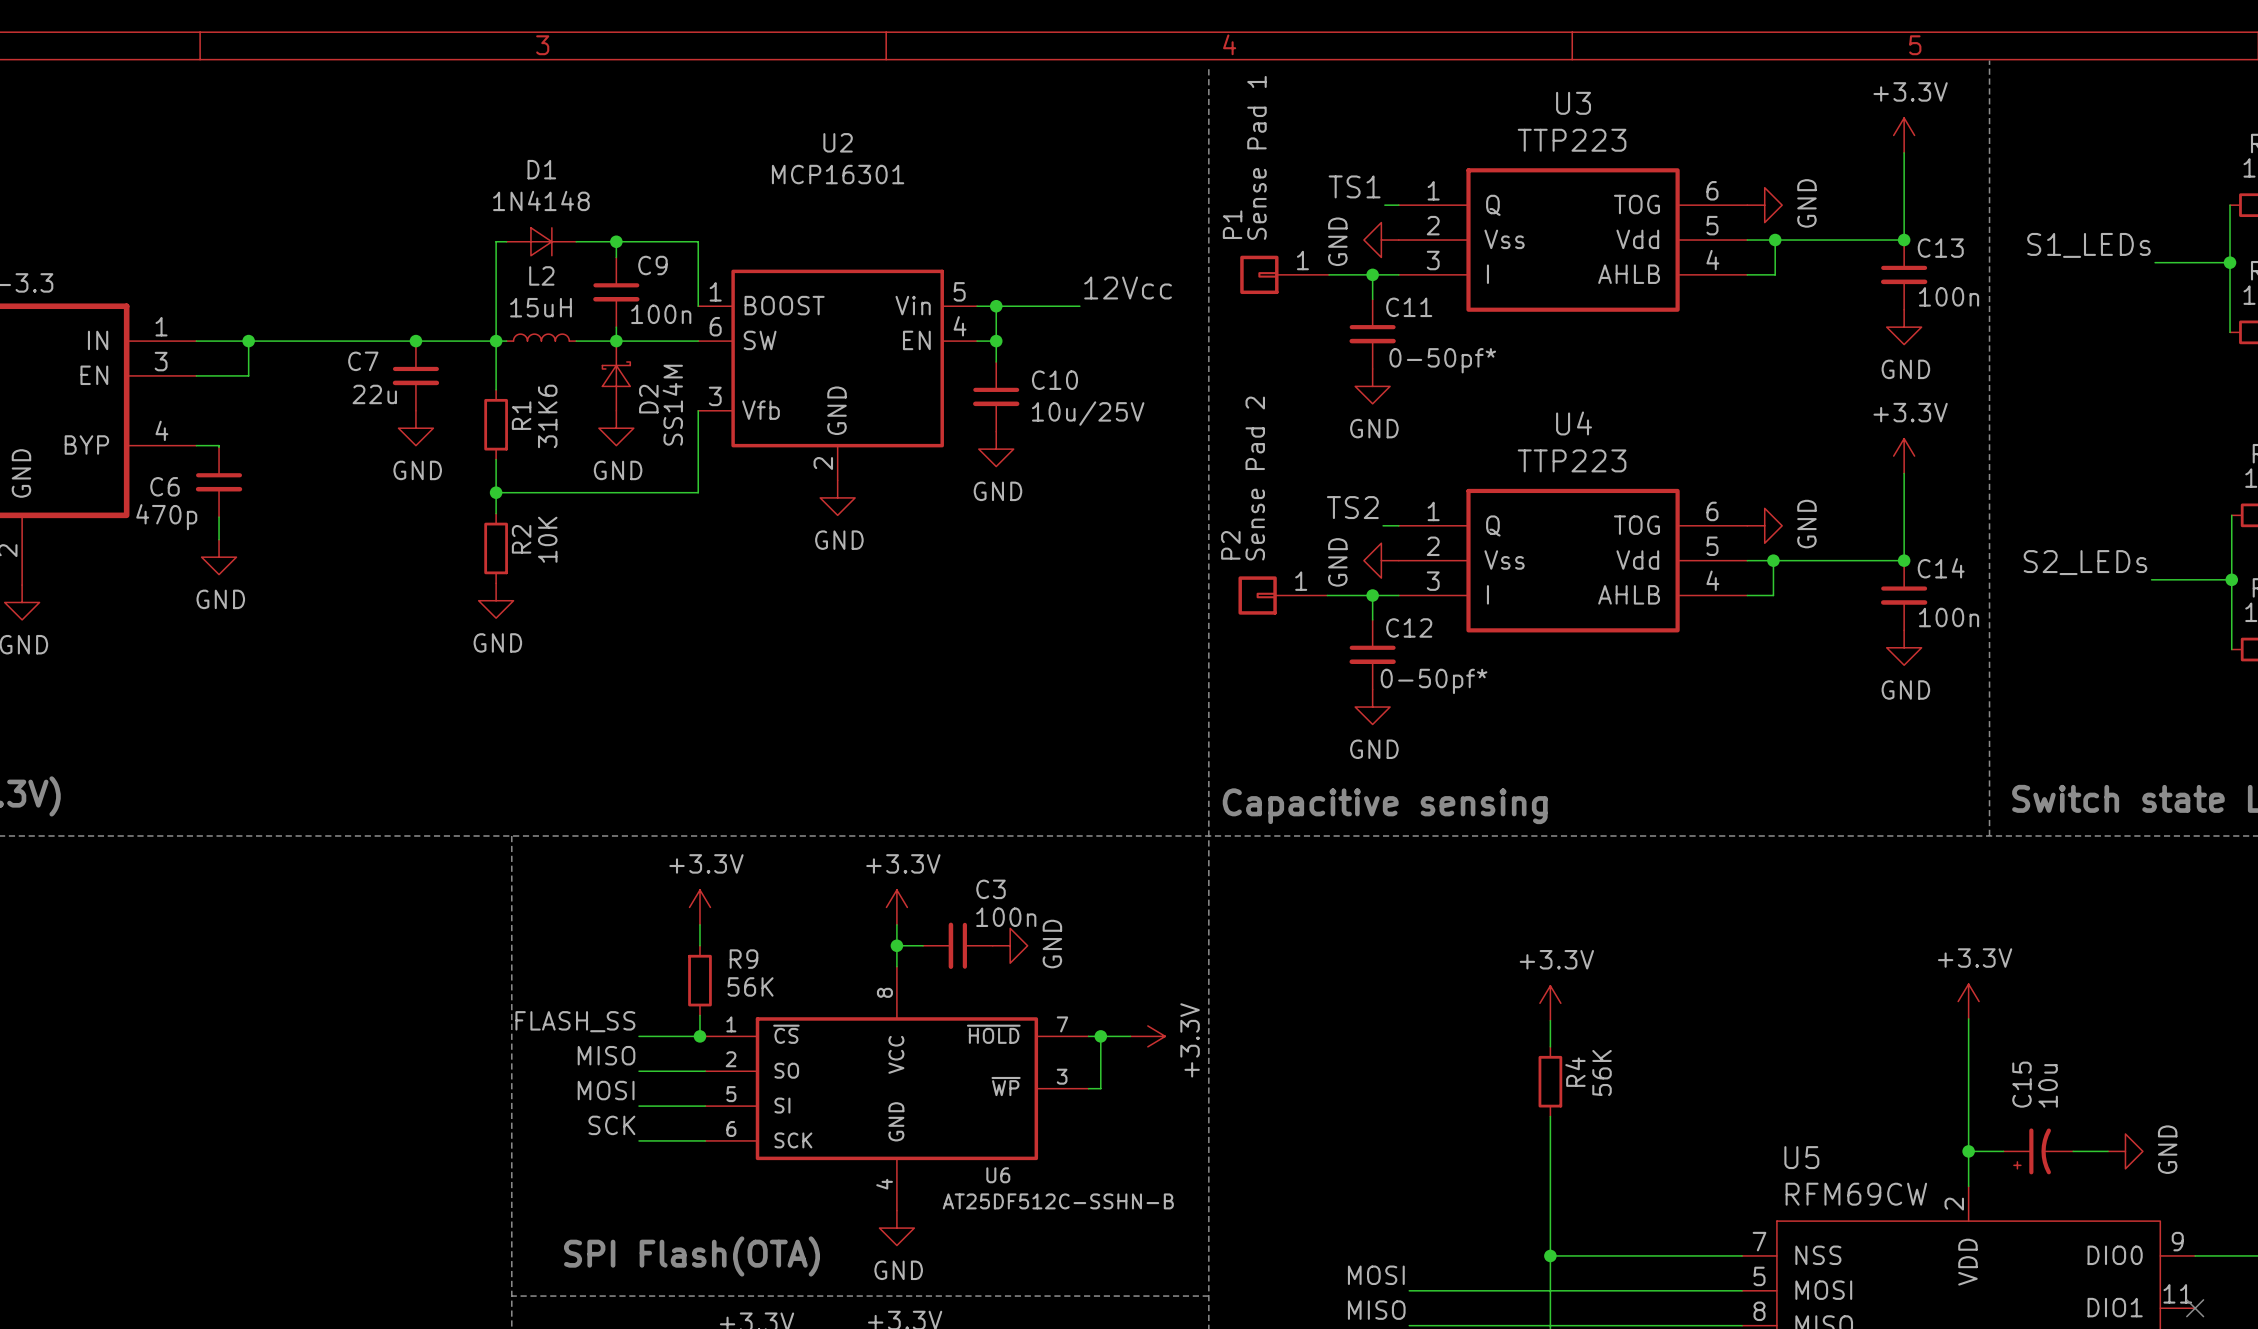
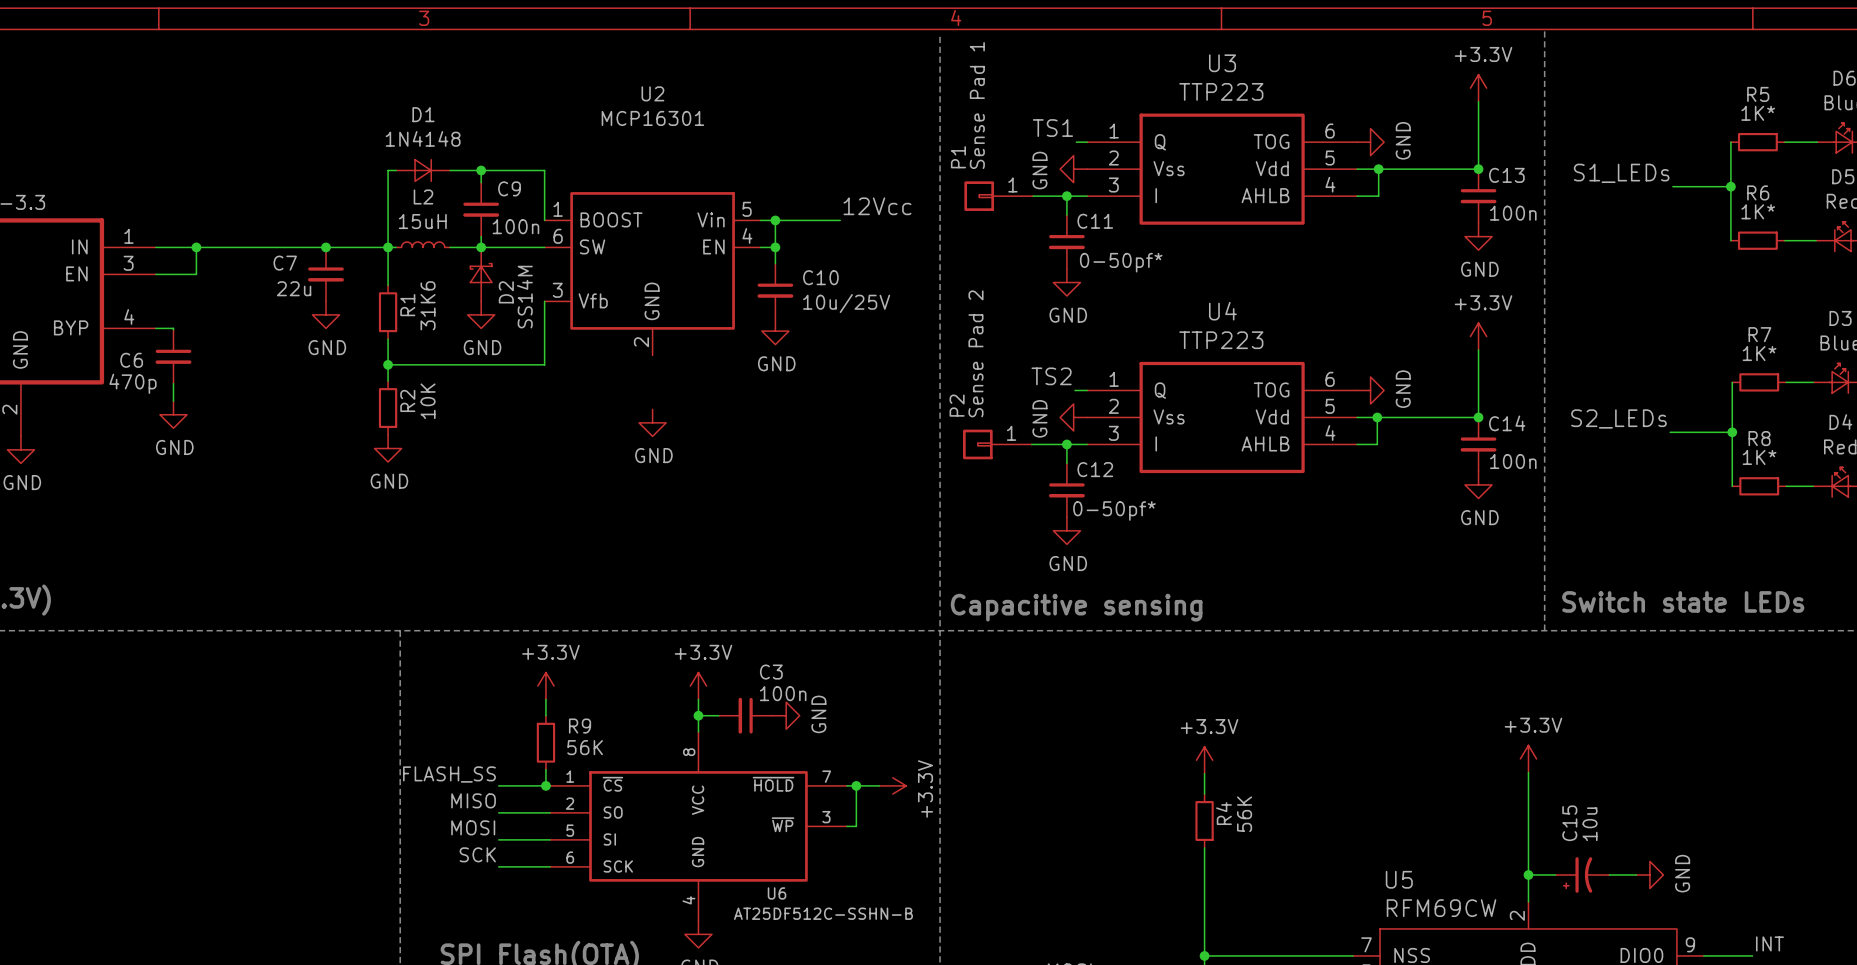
power symbol position: GND (837, 497) -> GND (652, 422)

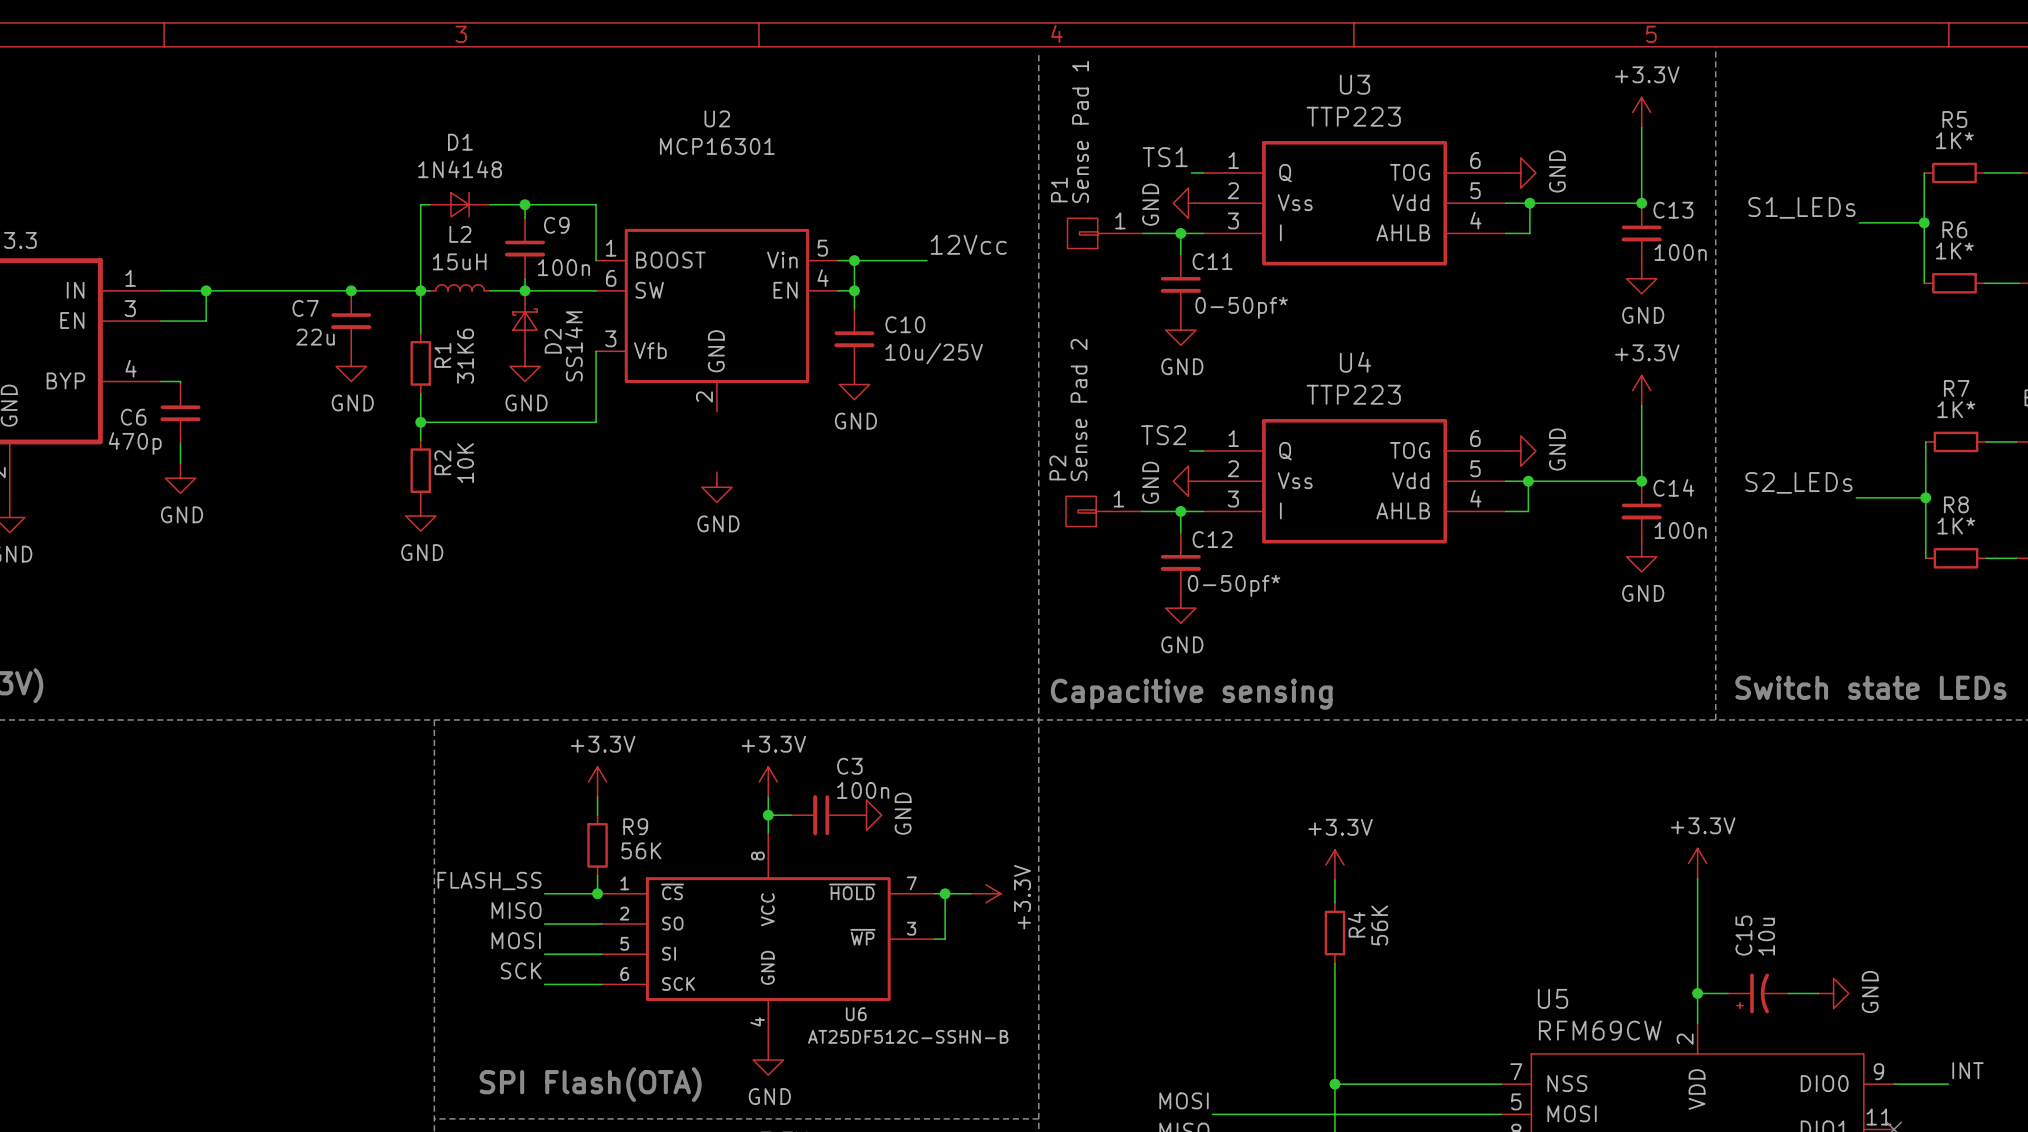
P1 symbol: [964, 181, 1034, 211] -> [1067, 218, 1144, 249]
P2 symbol: [962, 429, 1032, 460] -> [1065, 496, 1142, 527]

